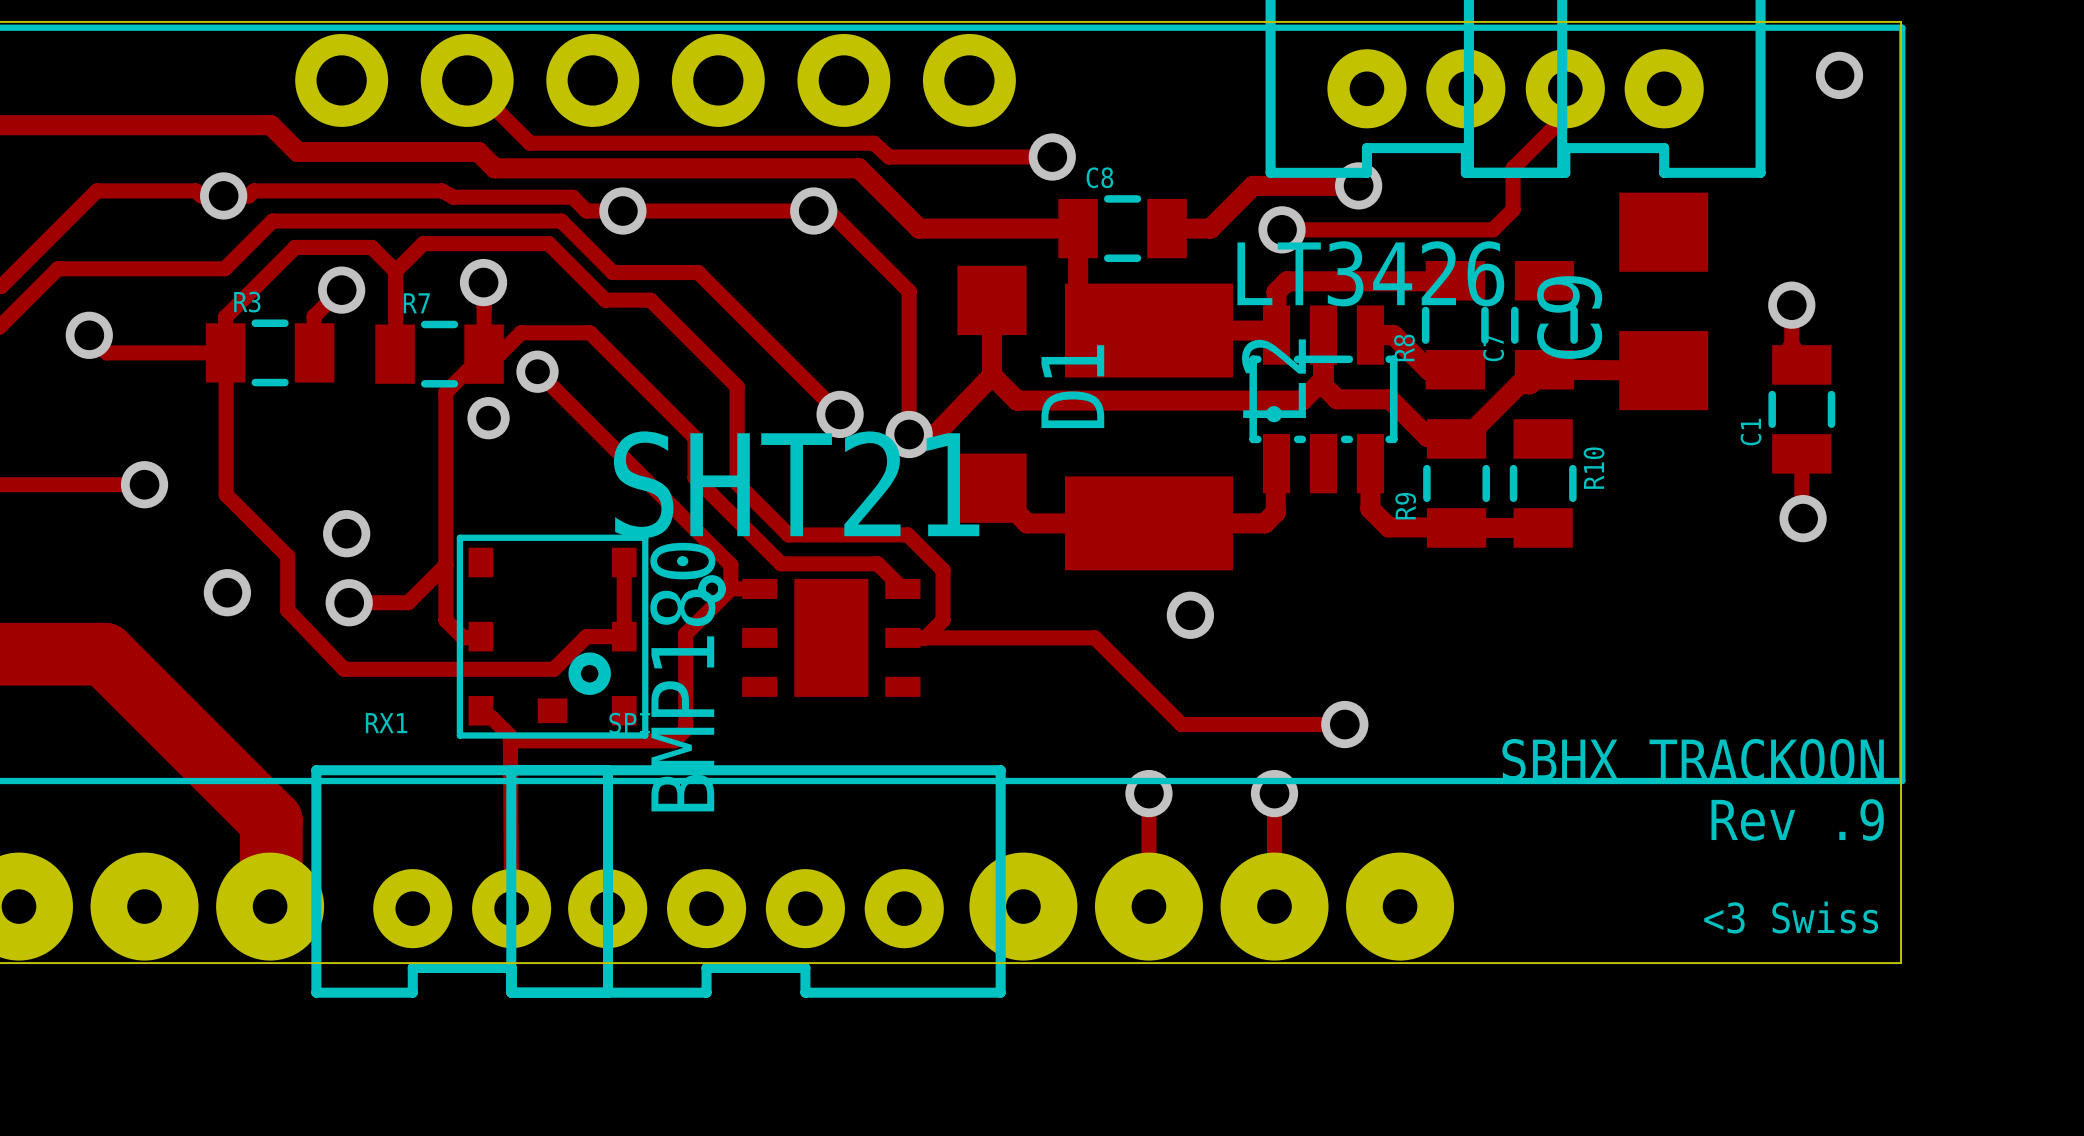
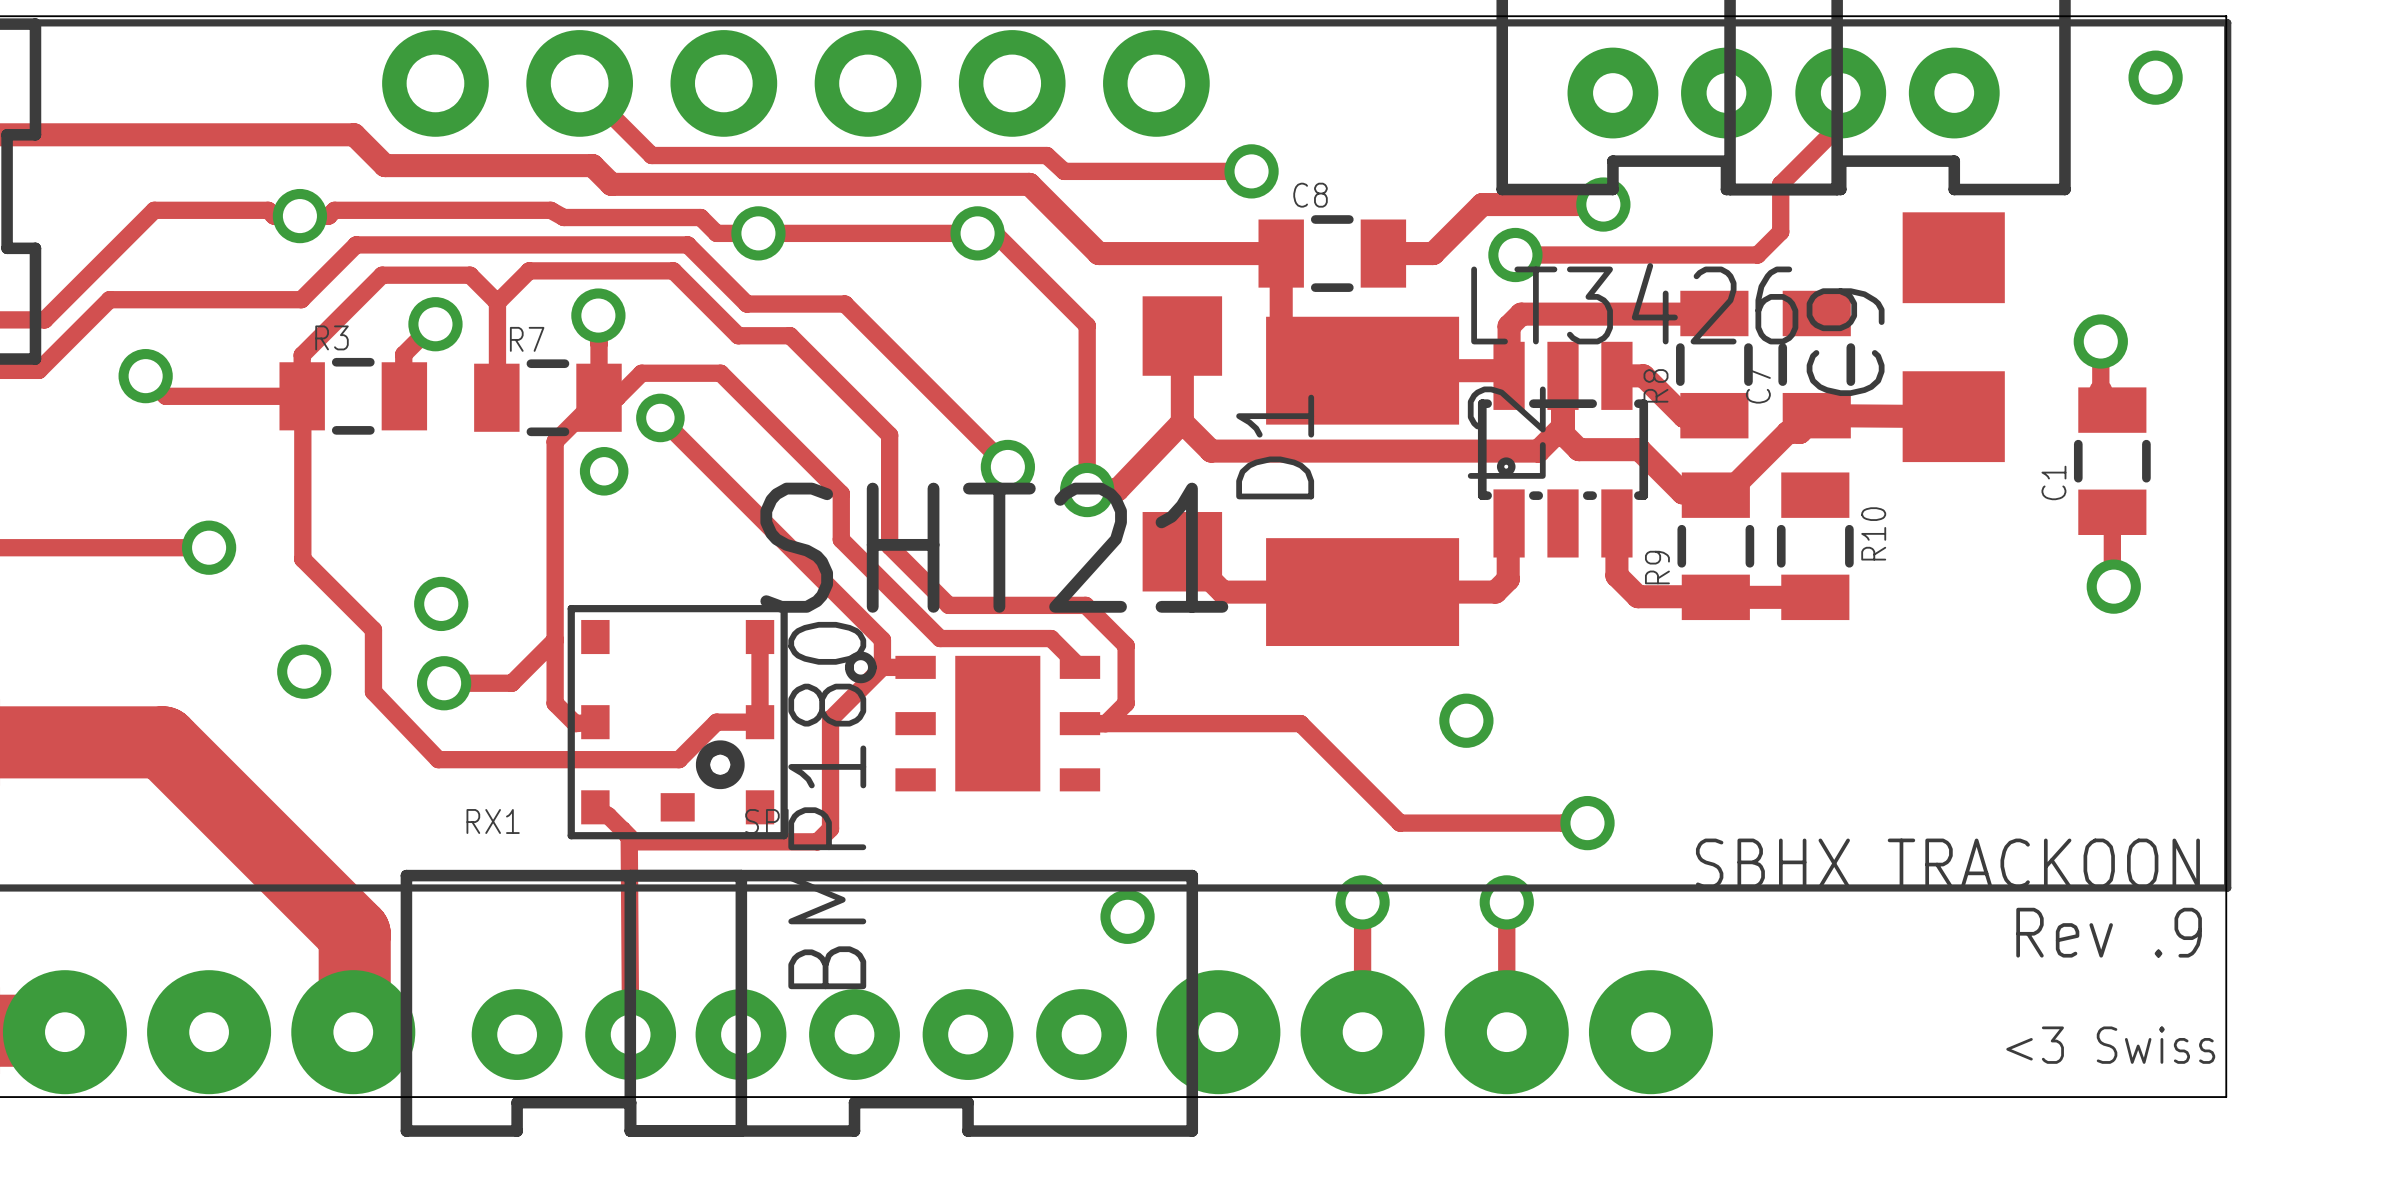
via position: (1190, 615) -> (1466, 720)
via: none -> (1127, 916)

